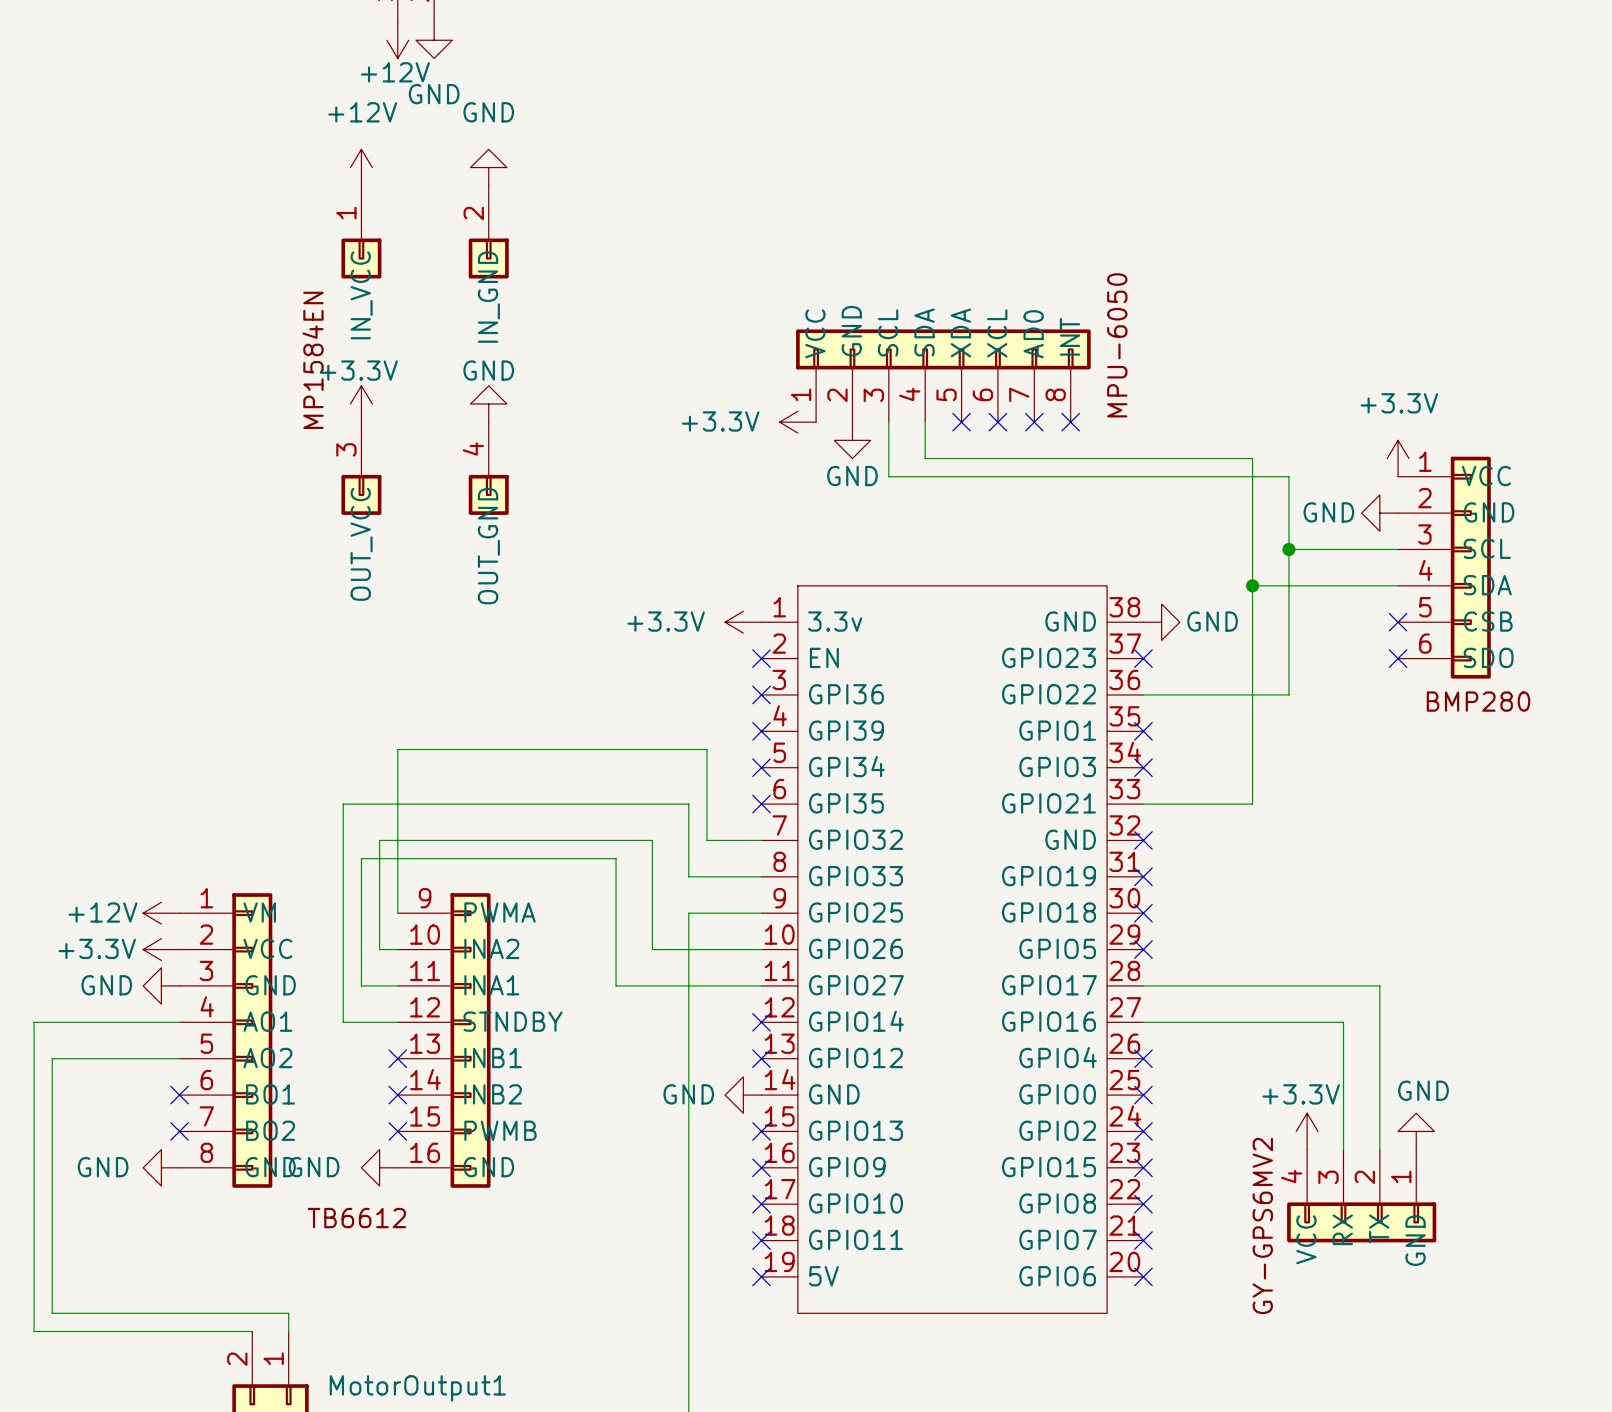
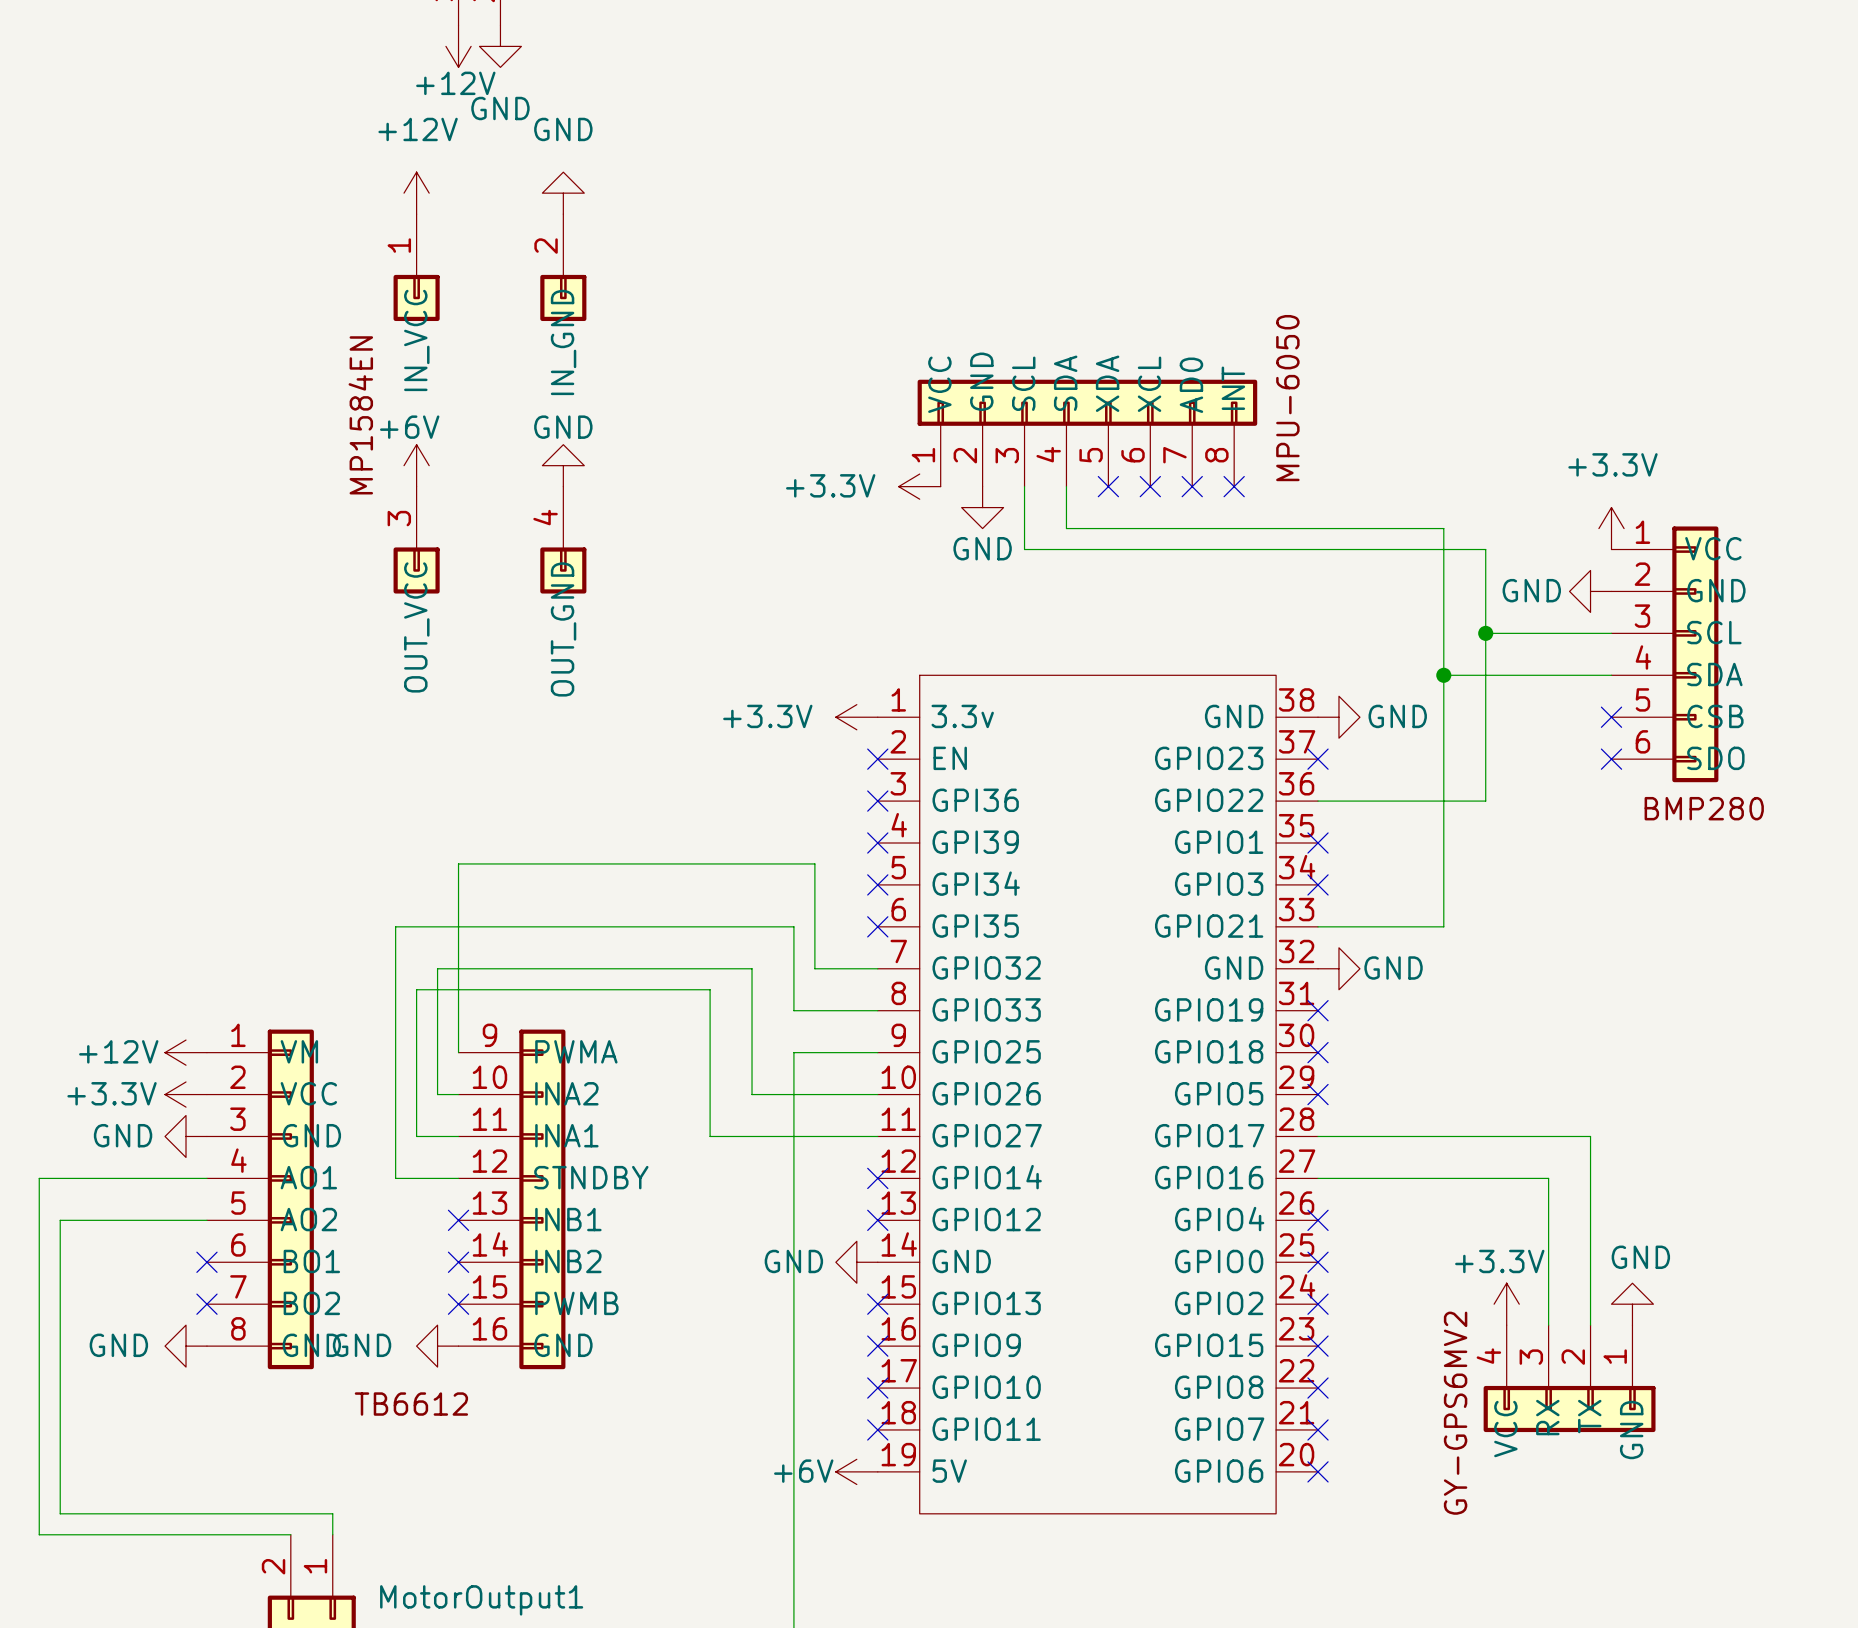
power symbol: +3.3V (361, 403) -> +6V (416, 465)
no-connect mark: (1143, 840) -> none
power symbol: none -> GND (1338, 968)
power symbol: none -> +6V (856, 1471)
no-connect mark: (761, 1276) -> none

